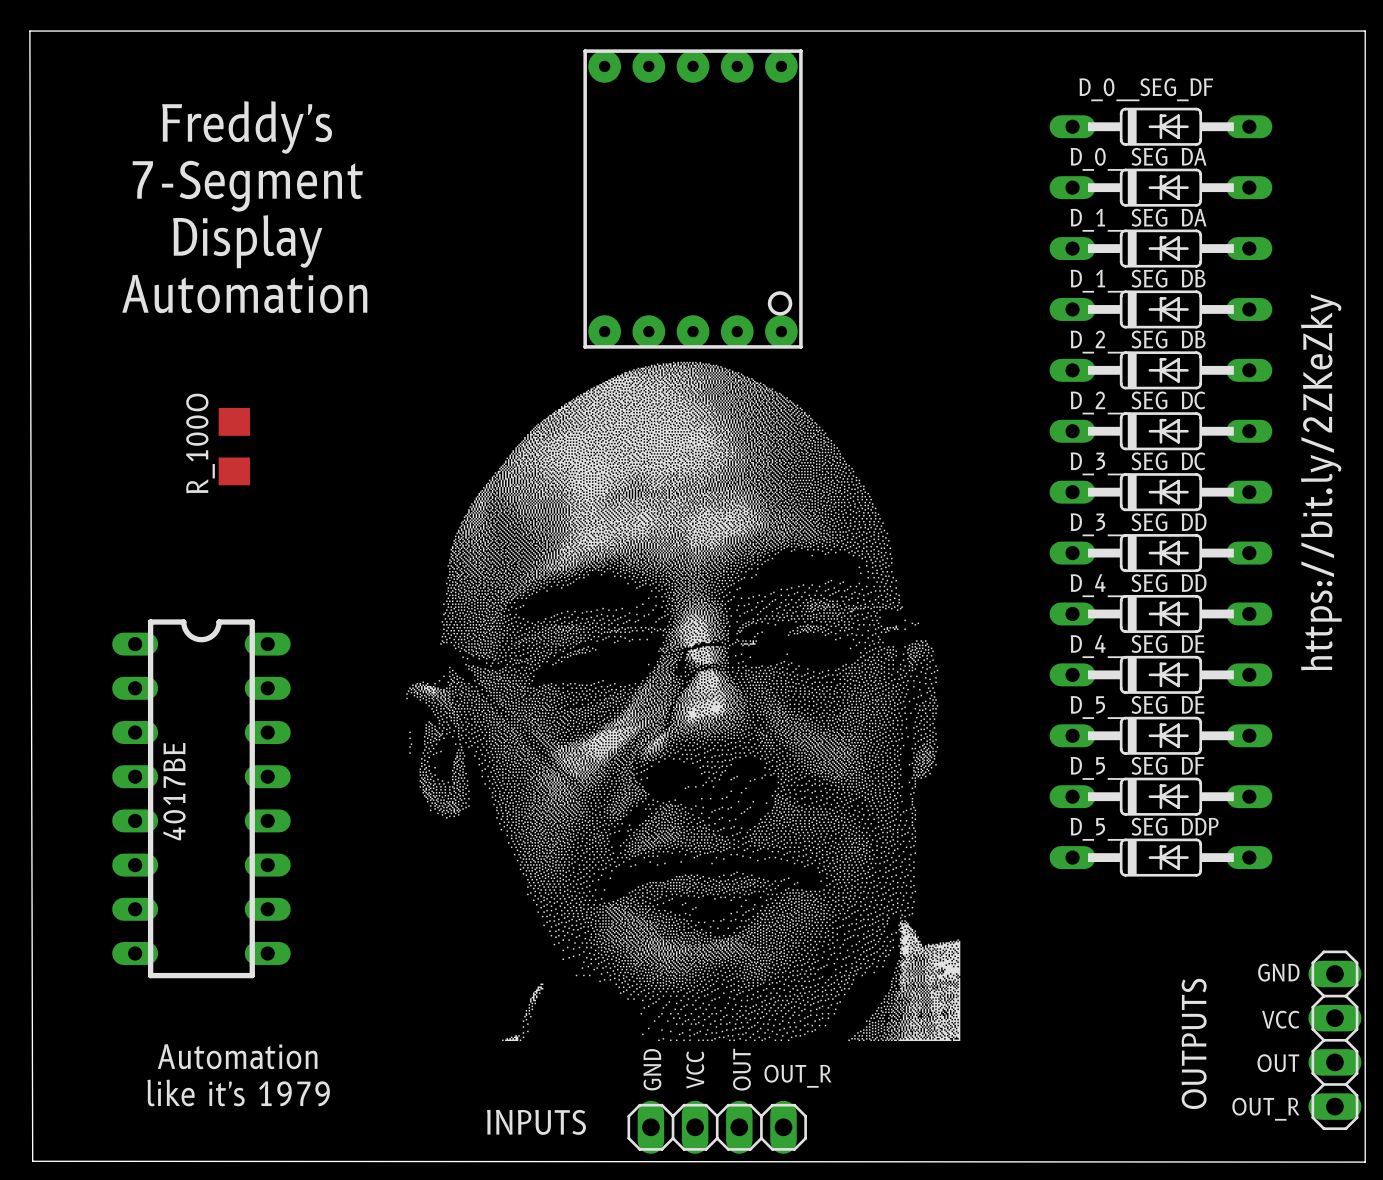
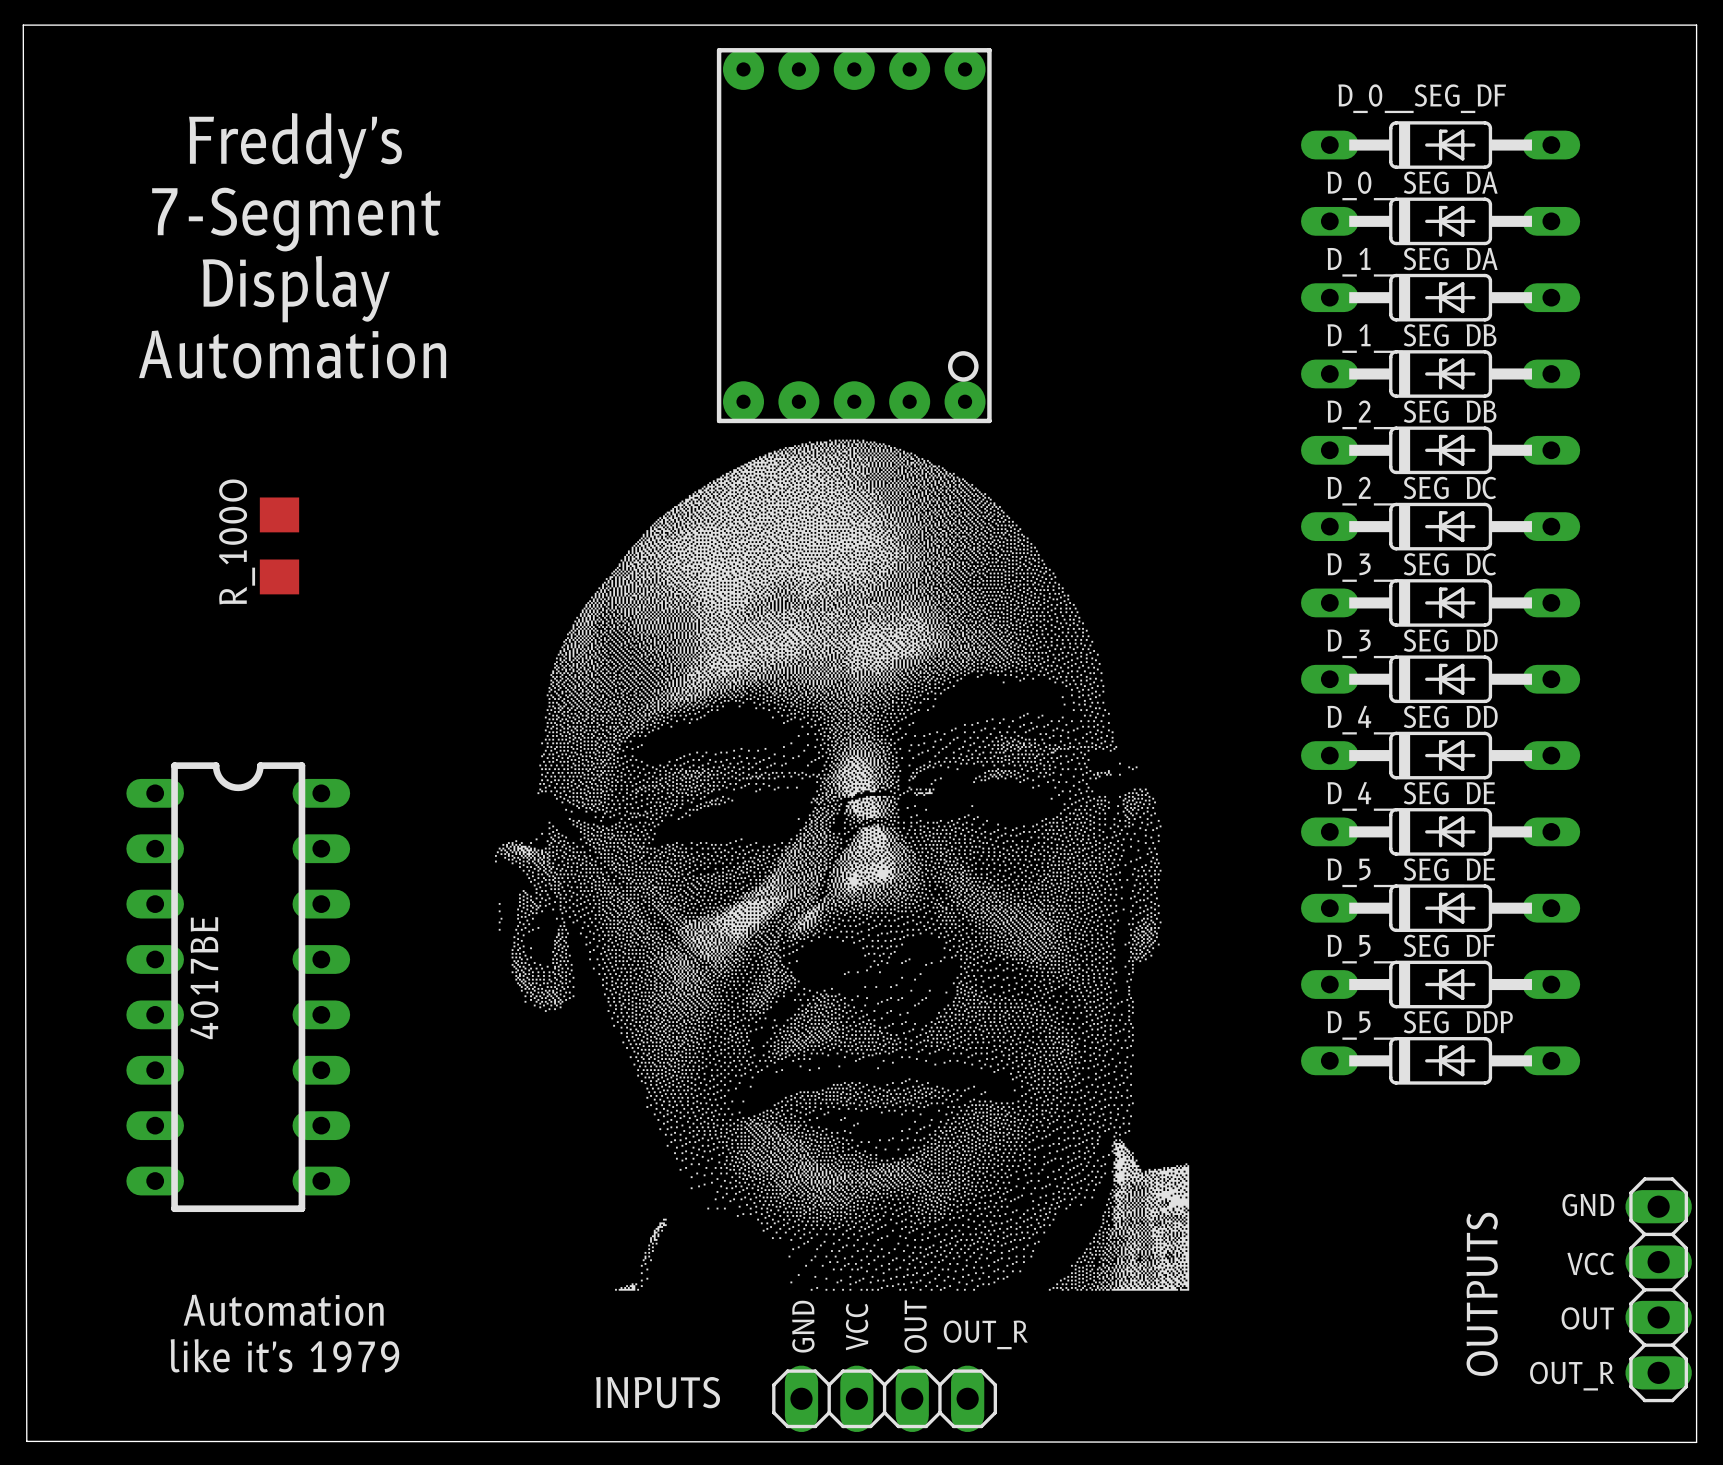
text: https://bit.ly/2ZKeZky (1321, 482) -> none

